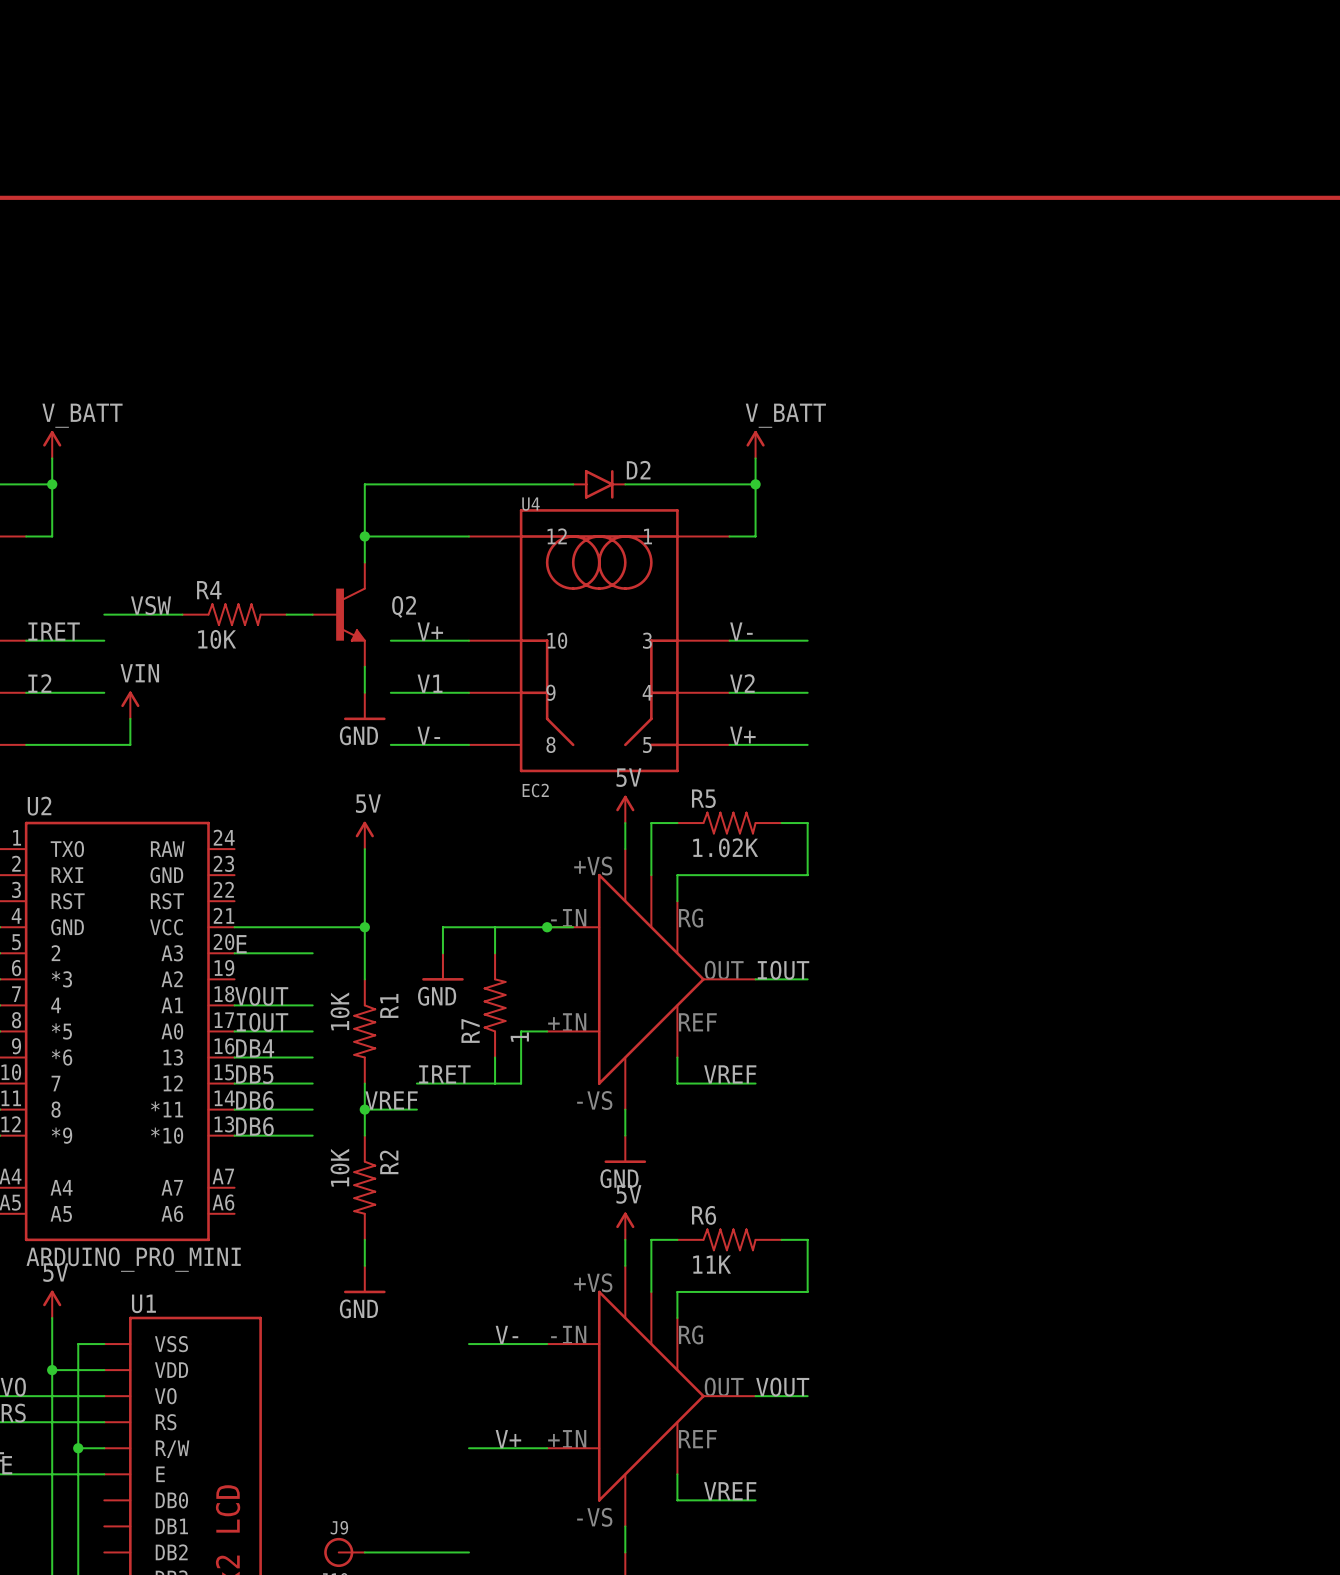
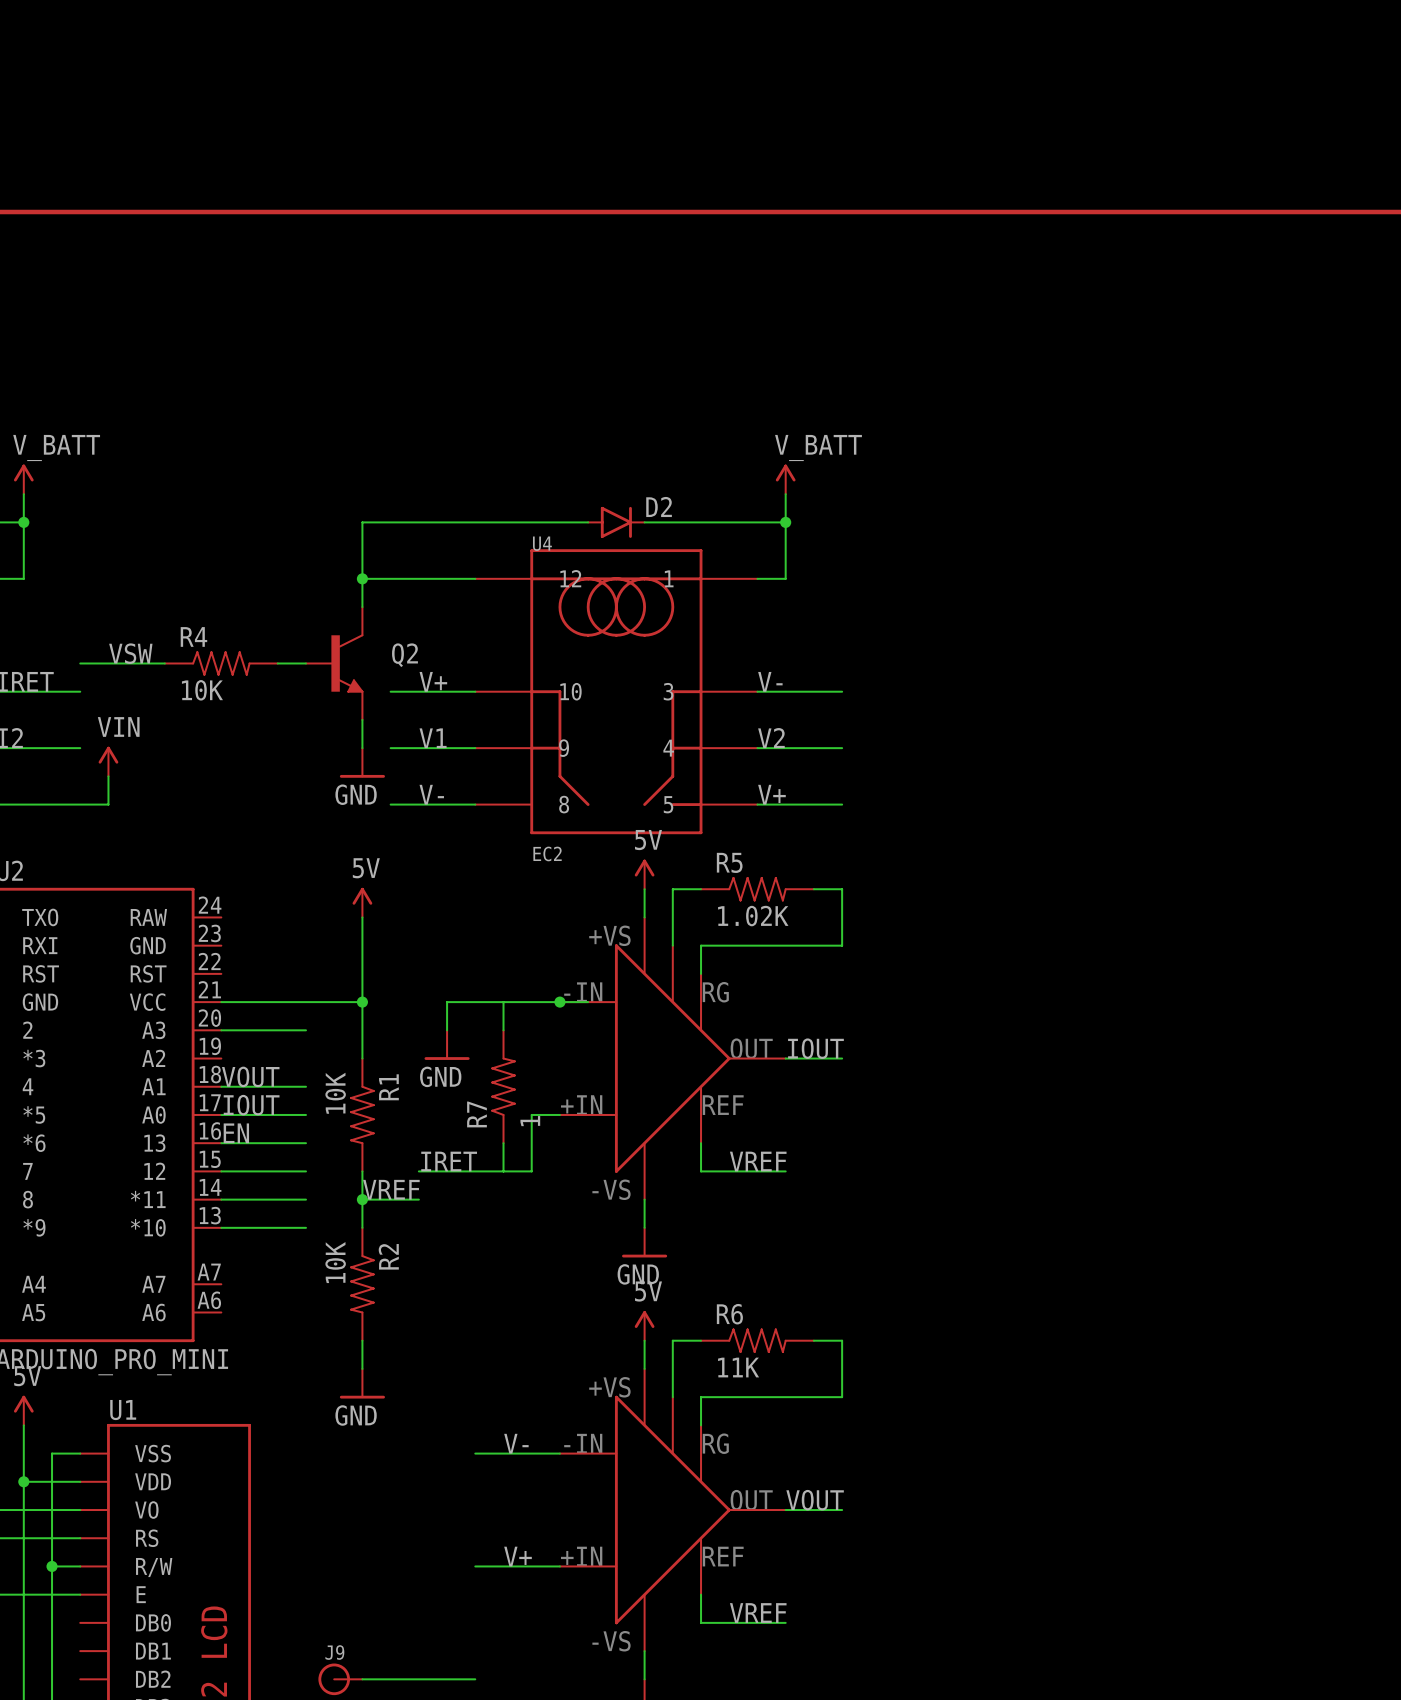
label: E (241, 944) -> none
label: DB4 (255, 1048) -> EN (236, 1133)
label: DB5 (254, 1074) -> none
label: DB6 (254, 1100) -> none
label: DB6 (254, 1126) -> none

